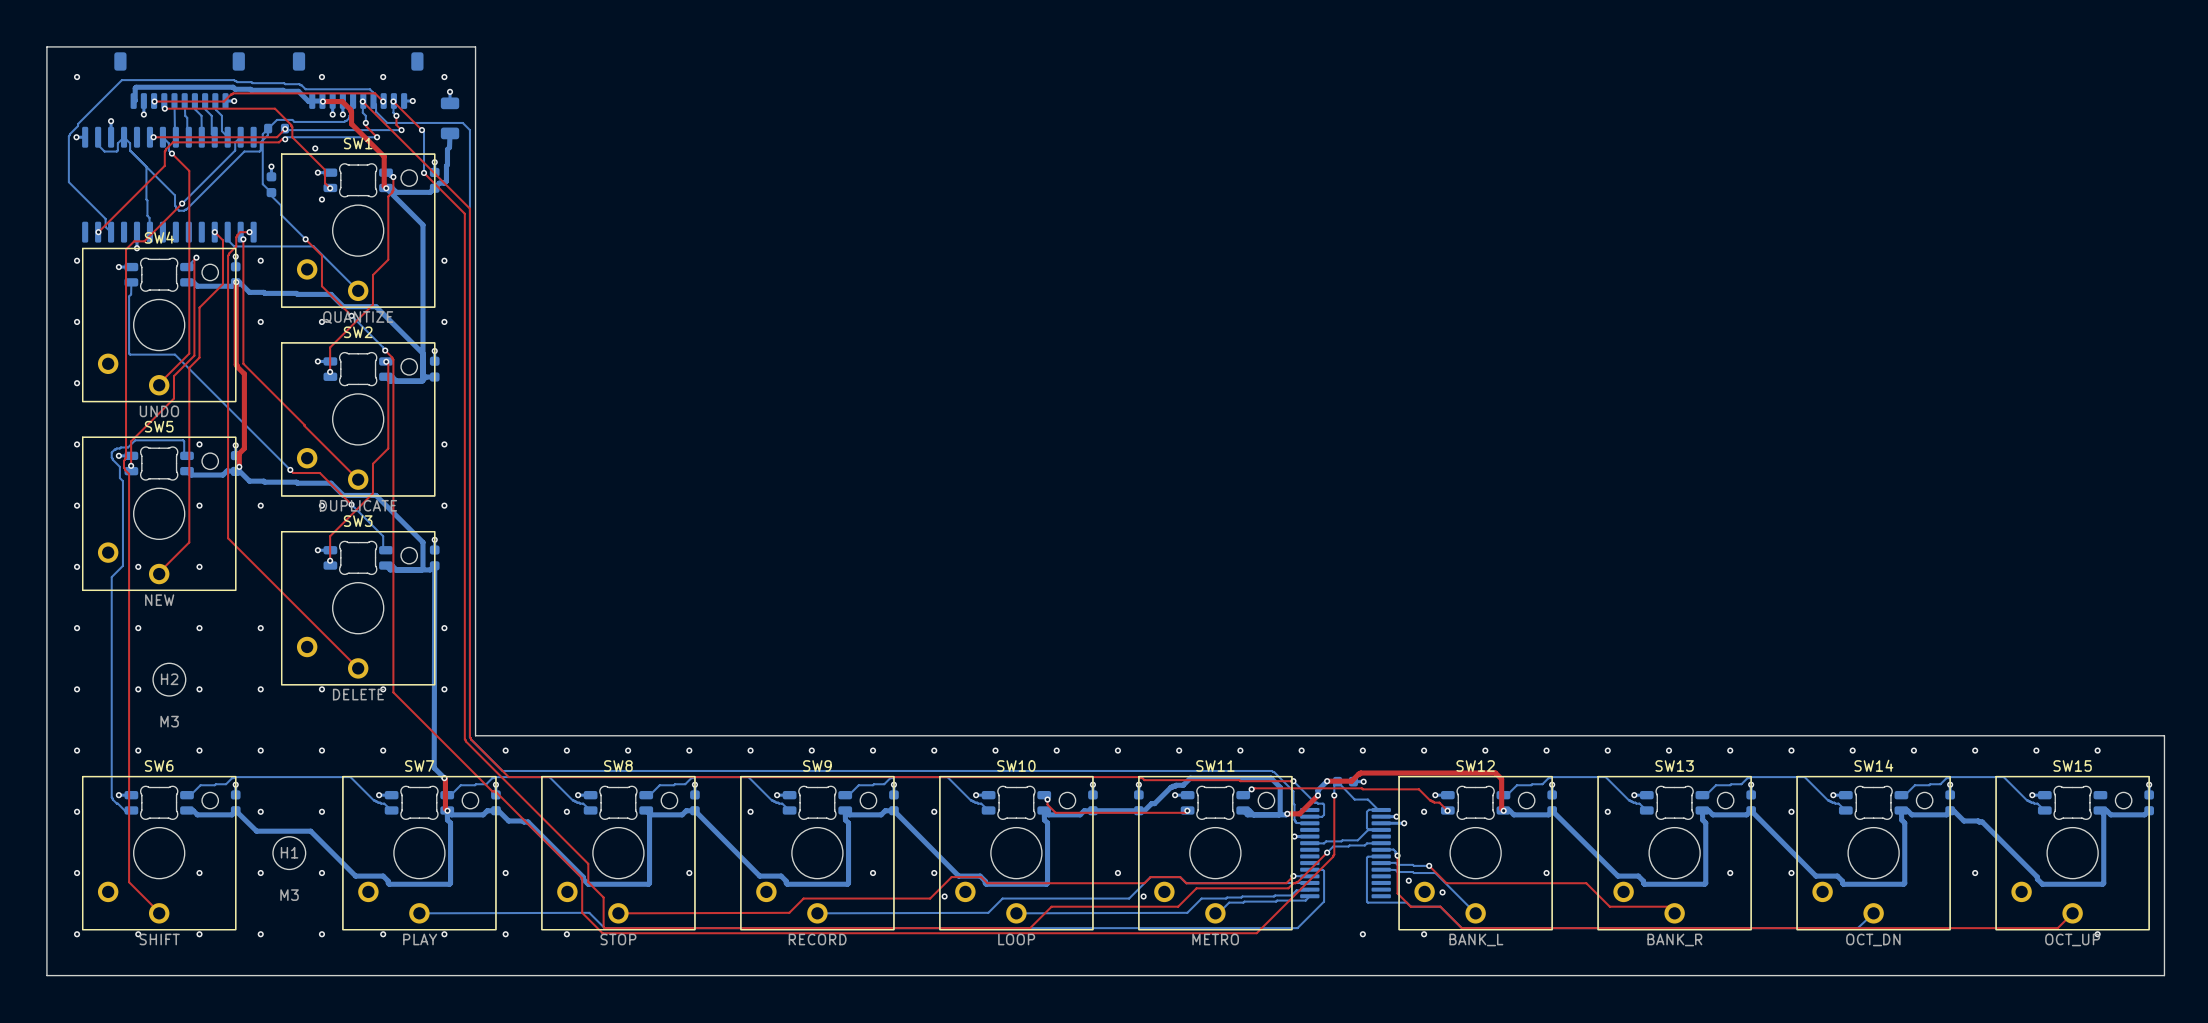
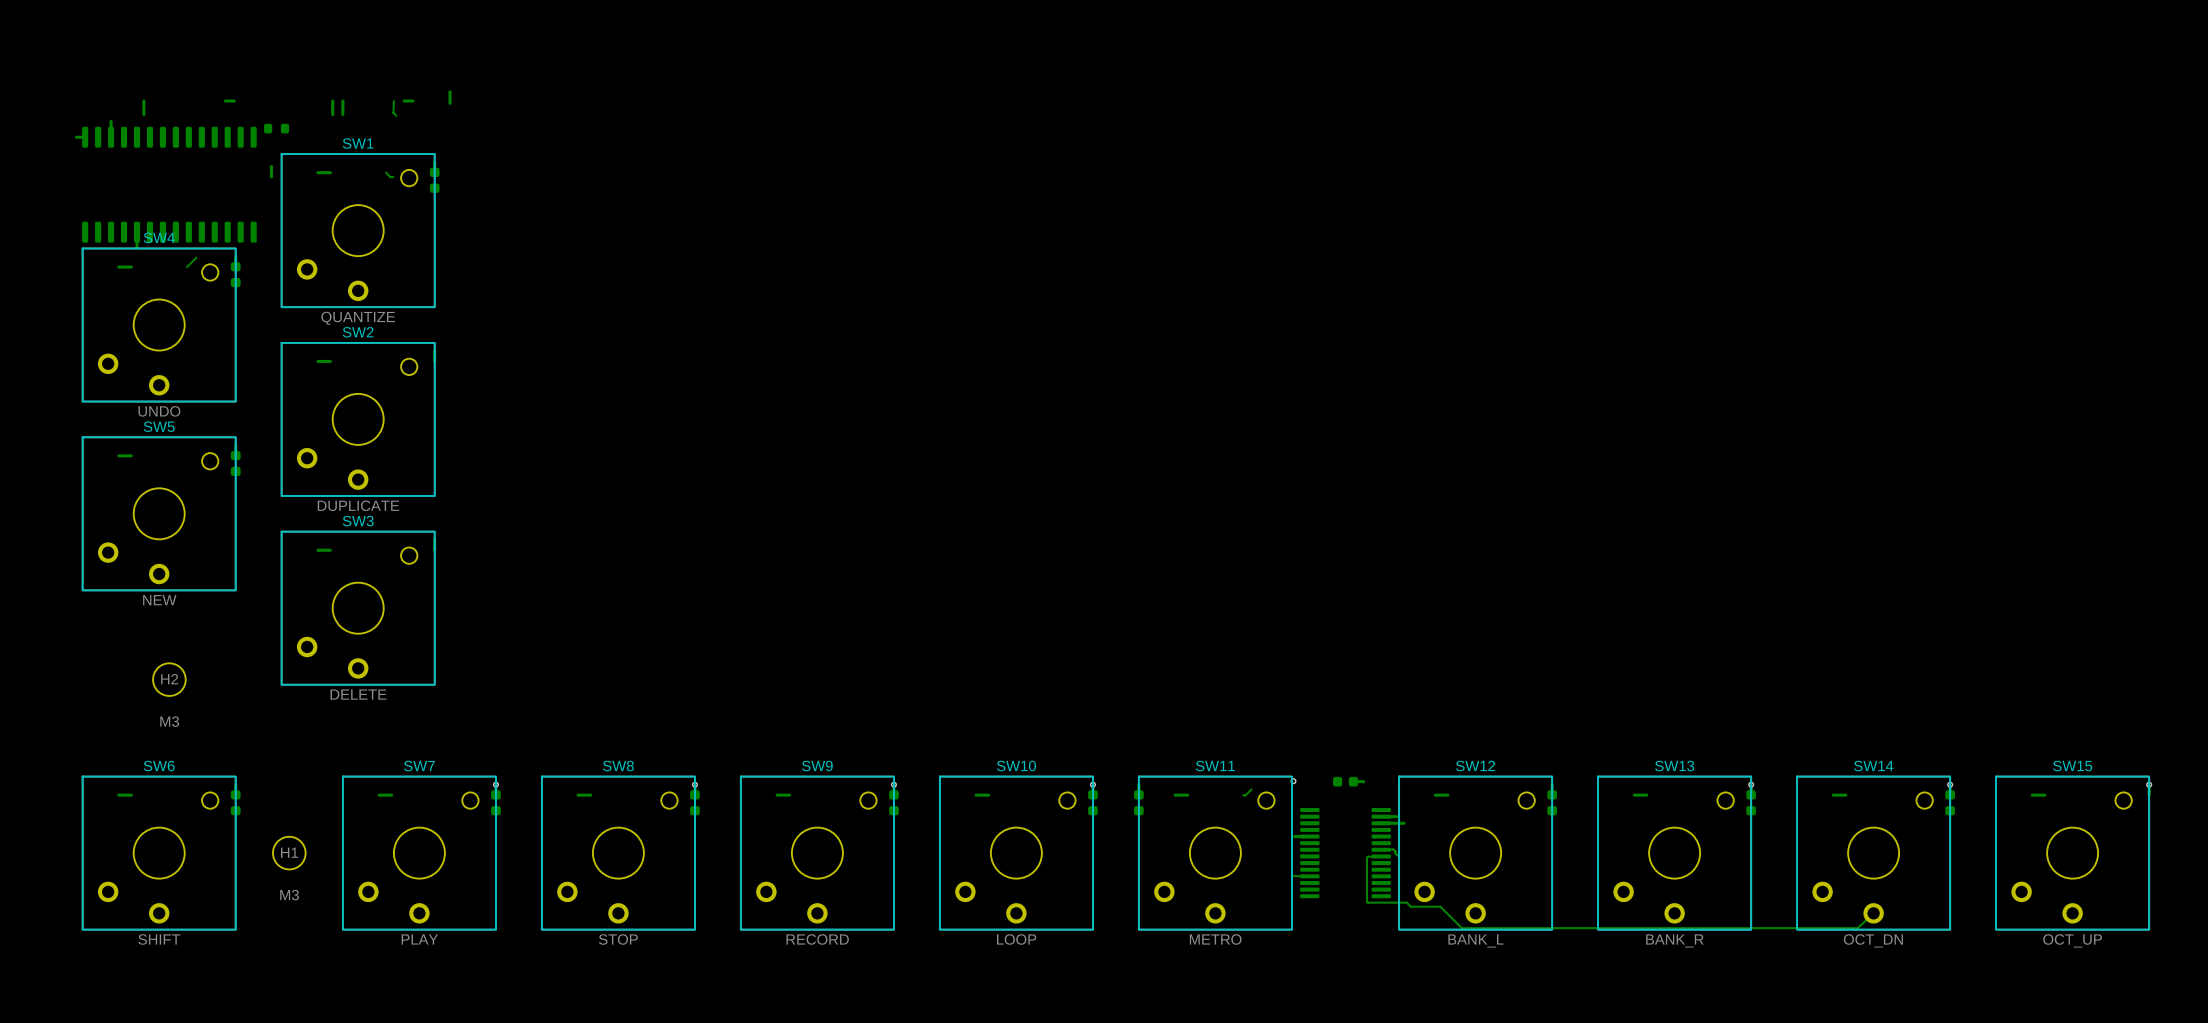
board edge: (46, 46) (46, 975) (2164, 975) (2164, 735) (475, 735) (475, 46) (46, 46) -> none
via: (77, 77) -> none
via: (321, 77) -> none
via: (383, 77) -> none
via: (444, 77) -> none
part: (179, 80) -> none
part: (358, 80) -> none
via: (450, 91) -> none
bottom track: (133, 101) (136, 87) (233, 87) (235, 89) (251, 90) (298, 91) (308, 101) (322, 101) -> none
top track: (154, 101) (223, 101) (233, 93) (375, 93) (383, 101) -> none
via: (154, 101) -> none
bottom track: (174, 101) (175, 137) -> none
bottom track: (184, 101) (188, 137) -> none
bottom track: (194, 101) (195, 109) (201, 115) (201, 137) -> none
bottom track: (205, 101) (205, 109) (211, 115) (211, 134) (214, 137) -> none
bottom track: (215, 101) (215, 109) (221, 115) (221, 131) (227, 137) -> none
via: (234, 101) -> none
top track: (322, 101) (342, 101) (350, 109) (351, 123) (384, 156) (384, 186) (386, 188) -> none
via: (322, 101) -> none
bottom track: (353, 101) (352, 112) (344, 121) (294, 121) (292, 119) (277, 119) (268, 128) -> none
top track: (362, 101) (469, 208) (469, 737) (508, 777) (1139, 777) (1144, 780) (1293, 781) -> none
via: (362, 101) -> none
bottom track: (363, 101) (362, 112) (365, 115) (365, 122) -> none
via: (383, 101) -> none
top track: (393, 101) (421, 130) -> none
via: (393, 101) -> none
via: (412, 101) -> none
top track: (164, 108) (275, 108) (291, 125) (292, 137) (325, 169) (325, 183) (330, 188) -> none
via: (164, 108) -> none
via: (143, 114) -> none
via: (332, 114) -> none
via: (342, 114) -> none
top track: (396, 115) (396, 125) (401, 130) -> none
via: (396, 115) -> none
part: (450, 118) -> none
via: (111, 121) -> none
top track: (365, 122) (365, 126) (377, 137) -> none
via: (365, 122) -> none
bottom track: (268, 128) (262, 134) (262, 184) (281, 205) (281, 214) (305, 239) -> none
bottom track: (268, 128) (267, 135) (260, 142) (259, 151) (244, 151) (184, 210) (179, 210) (176, 207) (175, 195) (130, 150) (130, 143) (124, 137) (117, 143) (116, 151) (104, 151) (98, 145) (98, 137) -> none
bottom track: (284, 128) (286, 130) (401, 130) -> none
top track: (285, 129) (277, 137) (153, 137) -> none
via: (285, 129) -> none
via: (401, 130) -> none
bottom track: (421, 130) (424, 132) (424, 172) -> none
via: (421, 130) -> none
bottom track: (450, 133) (446, 181) (444, 183) (439, 183) (430, 192) (396, 192) (392, 188) (386, 187) (422, 225) (422, 380) -> none
via: (76, 137) -> none
via: (153, 137) -> none
bottom track: (162, 137) (168, 143) (168, 150) (171, 153) -> none
bottom track: (240, 137) (235, 142) (235, 150) (182, 203) -> none
bottom track: (377, 137) (287, 137) (285, 139) -> none
via: (377, 137) -> none
top track: (285, 139) (279, 142) (172, 142) (164, 151) (164, 165) (98, 232) -> none
via: (285, 139) -> none
via: (315, 148) -> none
top track: (171, 153) (189, 170) (189, 353) (159, 385) -> none
via: (171, 153) -> none
via: (434, 162) -> none
bottom track: (146, 166) (146, 199) (149, 232) -> none
via: (271, 166) -> none
via: (317, 172) -> none
top track: (424, 172) (464, 213) (464, 739) (588, 863) (588, 882) (603, 897) (604, 928) (1030, 928) (1051, 906) (1178, 906) (1196, 888) (1288, 888) (1297, 882) (1327, 852) -> none
via: (424, 172) -> none
top track: (393, 177) (393, 190) (388, 196) (388, 259) (372, 275) (372, 304) (330, 347) (330, 371) -> none
via: (393, 177) -> none
part: (358, 180) -> none
part: (271, 184) -> none
via: (330, 188) -> none
via: (386, 188) -> none
via: (321, 199) -> none
top track: (182, 203) (144, 241) (134, 241) (126, 249) (126, 457) (123, 467) (129, 474) (129, 882) (159, 913) -> none
via: (182, 203) -> none
via: (98, 232) -> none
bottom track: (111, 232) (105, 227) (105, 218) (68, 182) (68, 136) (78, 123) (121, 80) (234, 80) (237, 82) (252, 83) (299, 84) (305, 89) (369, 89) (372, 92) (376, 111) (387, 122) (462, 122) (469, 130) (469, 737) (502, 770) (1272, 770) (1293, 791) (1295, 822) (1309, 823) -> none
top track: (214, 232) (222, 240) (222, 284) (199, 307) (199, 357) (189, 367) (189, 542) (159, 574) -> none
via: (214, 232) -> none
bottom track: (227, 232) (228, 240) (234, 246) (313, 246) (358, 290) -> none
top track: (249, 232) (240, 232) (237, 235) (236, 246) (228, 255) (228, 538) (358, 668) -> none
via: (249, 232) -> none
top track: (243, 239) (243, 363) (358, 479) -> none
via: (243, 239) -> none
top track: (305, 239) (321, 255) (321, 286) (351, 315) -> none
via: (305, 239) -> none
via: (136, 248) -> none
via: (235, 256) -> none
top track: (196, 257) (194, 259) (194, 355) (173, 376) (173, 398) (131, 441) (131, 465) -> none
via: (196, 257) -> none
via: (77, 260) -> none
via: (260, 260) -> none
via: (444, 260) -> none
via: (118, 267) -> none
part: (159, 274) -> none
bottom track: (131, 282) (131, 294) (129, 296) (129, 353) (175, 354) (290, 469) -> none
bottom track: (187, 282) (193, 282) (197, 286) (232, 286) (239, 282) (249, 292) (331, 294) (343, 306) (376, 306) (422, 353) -> none
top track: (236, 282) (236, 364) (244, 374) (244, 448) (239, 453) (239, 466) -> none
via: (236, 282) -> none
bottom track: (351, 315) (385, 350) -> none
via: (351, 315) -> none
via: (77, 321) -> none
via: (260, 321) -> none
via: (321, 321) -> none
via: (444, 321) -> none
top track: (385, 350) (393, 359) (393, 692) (582, 878) (582, 912) (602, 933) (1256, 933) (1333, 856) (1334, 795) -> none
via: (385, 350) -> none
via: (434, 350) -> none
via: (317, 361) -> none
top track: (386, 361) (388, 363) (388, 448) (372, 463) (372, 493) (330, 536) (330, 560) -> none
via: (386, 361) -> none
part: (358, 369) -> none
part: (434, 369) -> none
via: (330, 371) -> none
bottom track: (434, 377) (426, 377) (421, 381) (390, 381) (386, 376) (392, 377) (396, 381) -> none
via: (77, 383) -> none
via: (77, 444) -> none
via: (199, 444) -> none
via: (444, 444) -> none
via: (235, 445) -> none
via: (118, 455) -> none
bottom track: (187, 455) (184, 452) (183, 440) (135, 440) (128, 447) (116, 448) (111, 452) (112, 459) (119, 466) (119, 478) (122, 481) (122, 565) (111, 577) (111, 797) (125, 810) (131, 810) -> none
part: (159, 463) -> none
via: (131, 465) -> none
via: (239, 466) -> none
top track: (290, 469) (293, 472) (319, 472) (351, 504) -> none
via: (290, 469) -> none
bottom track: (187, 471) (191, 475) (222, 475) (227, 470) (235, 471) -> none
bottom track: (235, 471) (239, 470) (249, 481) (331, 483) (343, 495) (376, 495) (422, 542) (421, 569) -> none
bottom track: (351, 504) (383, 536) (383, 547) (386, 550) -> none
via: (351, 504) -> none
via: (77, 505) -> none
via: (199, 505) -> none
via: (260, 505) -> none
via: (321, 505) -> none
via: (444, 505) -> none
via: (434, 539) -> none
via: (317, 550) -> none
part: (358, 557) -> none
part: (434, 557) -> none
via: (330, 560) -> none
via: (77, 566) -> none
via: (138, 566) -> none
via: (199, 566) -> none
bottom track: (396, 569) (392, 565) (386, 565) (390, 569) (430, 569) (434, 565) (434, 767) (444, 778) -> none
via: (77, 628) -> none
via: (138, 628) -> none
via: (199, 628) -> none
via: (260, 628) -> none
via: (444, 628) -> none
via: (77, 689) -> none
via: (138, 689) -> none
via: (199, 689) -> none
via: (260, 689) -> none
via: (321, 689) -> none
via: (383, 689) -> none
via: (444, 689) -> none
via: (77, 750) -> none
via: (138, 750) -> none
via: (199, 750) -> none
via: (260, 750) -> none
via: (321, 750) -> none
via: (383, 750) -> none
via: (505, 750) -> none
via: (566, 750) -> none
via: (628, 750) -> none
via: (689, 750) -> none
via: (750, 750) -> none
via: (811, 750) -> none
via: (873, 750) -> none
via: (934, 750) -> none
via: (995, 750) -> none
via: (1056, 750) -> none
via: (1117, 750) -> none
via: (1179, 750) -> none
via: (1240, 750) -> none
via: (1301, 750) -> none
via: (1362, 750) -> none
via: (1424, 750) -> none
via: (1485, 750) -> none
via: (1546, 750) -> none
via: (1607, 750) -> none
via: (1669, 750) -> none
via: (1730, 750) -> none
via: (1791, 750) -> none
via: (1852, 750) -> none
via: (1913, 750) -> none
via: (1975, 750) -> none
via: (2036, 750) -> none
via: (2097, 750) -> none
top track: (444, 778) (445, 808) (447, 810) -> none
via: (444, 778) -> none
bottom track: (1293, 781) (1314, 802) (1324, 804) (1324, 814) (1322, 816) (1309, 816) -> none
top track: (1327, 781) (1351, 781) (1360, 773) (1495, 773) (1501, 779) (1501, 808) (1503, 810) -> none
bottom track: (1327, 781) (1317, 790) (1317, 795) -> none
via: (1327, 781) -> none
via: (1363, 781) -> none
via: (235, 784) -> none
via: (1138, 784) -> none
via: (1552, 784) -> none
top track: (1251, 789) (1418, 789) (1430, 800) (1439, 802) (1447, 810) -> none
via: (1251, 789) -> none
via: (118, 795) -> none
bottom track: (187, 795) (190, 795) (200, 785) (226, 784) (235, 777) (350, 777) (374, 800) (384, 803) (391, 810) -> none
via: (379, 795) -> none
bottom track: (447, 795) (450, 795) (460, 785) (486, 784) (495, 777) (549, 777) (573, 800) (583, 803) (590, 810) -> none
via: (578, 795) -> none
bottom track: (646, 795) (649, 795) (659, 785) (685, 784) (694, 777) (748, 777) (772, 800) (782, 803) (789, 810) -> none
via: (777, 795) -> none
bottom track: (845, 795) (848, 795) (858, 785) (884, 784) (893, 777) (947, 777) (970, 800) (981, 803) (988, 810) -> none
via: (976, 795) -> none
via: (1175, 795) -> none
top track: (1317, 795) (1299, 813) (1287, 813) -> none
via: (1317, 795) -> none
bottom track: (1334, 795) (1334, 785) (1337, 781) (1354, 799) (1367, 799) (1378, 809) (1381, 810) (1368, 809) (1366, 811) (1366, 828) (1381, 829) (1367, 830) (1357, 840) (1309, 843) -> none
via: (1334, 795) -> none
via: (1435, 795) -> none
bottom track: (1503, 795) (1506, 795) (1516, 785) (1542, 784) (1551, 777) (1605, 777) (1629, 800) (1639, 803) (1646, 810) -> none
via: (1634, 795) -> none
bottom track: (1702, 795) (1705, 795) (1715, 785) (1741, 784) (1750, 777) (1804, 777) (1828, 800) (1838, 803) (1845, 810) -> none
via: (1833, 795) -> none
bottom track: (1901, 795) (1904, 795) (1914, 785) (1940, 784) (1949, 777) (2003, 777) (2027, 800) (2037, 803) (2044, 810) -> none
via: (2032, 795) -> none
top track: (1047, 799) (1047, 804) (1055, 812) (1185, 812) (1187, 810) -> none
via: (1047, 799) -> none
part: (159, 802) -> none
part: (419, 802) -> none
part: (618, 802) -> none
part: (817, 802) -> none
part: (1016, 802) -> none
part: (1215, 802) -> none
part: (1475, 802) -> none
part: (1674, 802) -> none
part: (1873, 802) -> none
part: (2072, 802) -> none
part: (2149, 802) -> none
bottom track: (187, 810) (193, 810) (197, 814) (232, 814) (235, 810) (256, 831) (310, 831) (355, 876) (383, 876) (389, 884) (450, 883) (450, 823) (447, 819) (447, 810) (451, 814) (483, 814) (487, 810) (498, 810) (508, 820) (528, 822) (588, 884) (649, 883) (649, 813) (646, 810) (650, 814) (682, 814) (686, 810) (694, 810) (759, 876) (781, 876) (787, 884) (848, 883) (848, 823) (845, 819) (845, 810) (849, 814) (881, 814) (885, 810) (893, 810) (958, 876) (980, 876) (986, 884) (1047, 883) (1047, 823) (1044, 819) (1044, 810) (1048, 814) (1080, 814) (1084, 810) (1144, 810) (1171, 787) (1183, 785) (1190, 778) (1271, 778) (1280, 787) (1279, 814) -> none
via: (447, 810) -> none
via: (1187, 810) -> none
via: (1447, 810) -> none
bottom track: (1503, 810) (1509, 810) (1513, 814) (1548, 814) (1552, 810) (1617, 876) (1638, 876) (1644, 884) (1705, 883) (1705, 823) (1702, 819) (1702, 810) (1708, 810) (1712, 814) (1746, 814) (1751, 810) (1815, 876) (1837, 876) (1843, 884) (1904, 883) (1904, 823) (1901, 819) (1901, 810) (1907, 810) (1911, 814) (1946, 814) (1950, 810) (1953, 810) (1963, 820) (1982, 822) (2042, 884) (2102, 884) (2103, 813) (2100, 810) (2106, 810) (2110, 814) (2144, 814) (2149, 810) -> none
via: (1503, 810) -> none
via: (77, 811) -> none
via: (260, 811) -> none
via: (321, 811) -> none
via: (566, 811) -> none
via: (750, 811) -> none
via: (934, 811) -> none
via: (1424, 811) -> none
via: (1607, 811) -> none
via: (1791, 811) -> none
bottom track: (1287, 813) (1286, 814) (1247, 814) (1243, 810) (1249, 810) (1253, 814) -> none
via: (1287, 813) -> none
via: (1396, 816) -> none
via: (1404, 823) -> none
via: (1294, 836) -> none
bottom track: (1381, 843) (1333, 846) (1327, 852) -> none
via: (1327, 852) -> none
top track: (1397, 855) (1397, 893) (1410, 906) (1440, 906) (1461, 928) (2057, 928) (2072, 913) -> none
via: (1397, 855) -> none
bottom track: (1381, 863) (1429, 865) -> none
top track: (1429, 865) (1446, 883) (1586, 883) (1609, 906) (1669, 906) (1674, 913) -> none
via: (1429, 865) -> none
bottom track: (1309, 869) (1324, 870) (1324, 901) (1297, 928) (604, 928) (589, 912) (419, 913) -> none
bottom track: (1381, 869) (1435, 873) (1475, 913) -> none
via: (77, 873) -> none
via: (199, 873) -> none
via: (260, 873) -> none
via: (321, 873) -> none
via: (505, 873) -> none
via: (689, 873) -> none
via: (873, 873) -> none
via: (934, 873) -> none
via: (1117, 873) -> none
via: (1546, 873) -> none
via: (1730, 873) -> none
via: (1791, 873) -> none
via: (1975, 873) -> none
top track: (1293, 876) (1286, 883) (1186, 883) (1180, 877) (1150, 877) (1144, 883) (987, 883) (981, 877) (951, 877) (930, 898) (803, 898) (789, 912) (618, 913) -> none
via: (1293, 876) -> none
via: (1408, 880) -> none
bottom track: (1309, 882) (1186, 883) (1180, 877) (1150, 877) (1129, 898) (1002, 898) (988, 912) (817, 913) -> none
bottom track: (1309, 889) (1296, 890) (1291, 895) (1201, 898) (1187, 912) (1016, 913) -> none
via: (1442, 892) -> none
via: (944, 896) -> none
via: (1143, 896) -> none
bottom track: (1309, 896) (1305, 900) (1229, 902) (1218, 912) (1215, 913) -> none
via: (77, 934) -> none
via: (138, 934) -> none
via: (199, 934) -> none
via: (260, 934) -> none
via: (321, 934) -> none
via: (383, 934) -> none
via: (444, 934) -> none
via: (505, 934) -> none
via: (566, 934) -> none
via: (1362, 934) -> none
via: (1424, 934) -> none
via: (2097, 934) -> none

